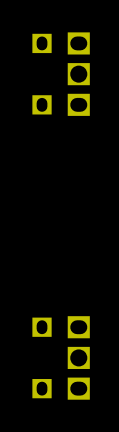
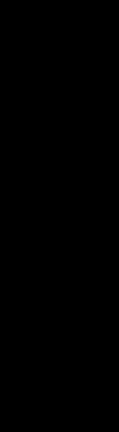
part: (61, 74) -> none
part: (61, 357) -> none

